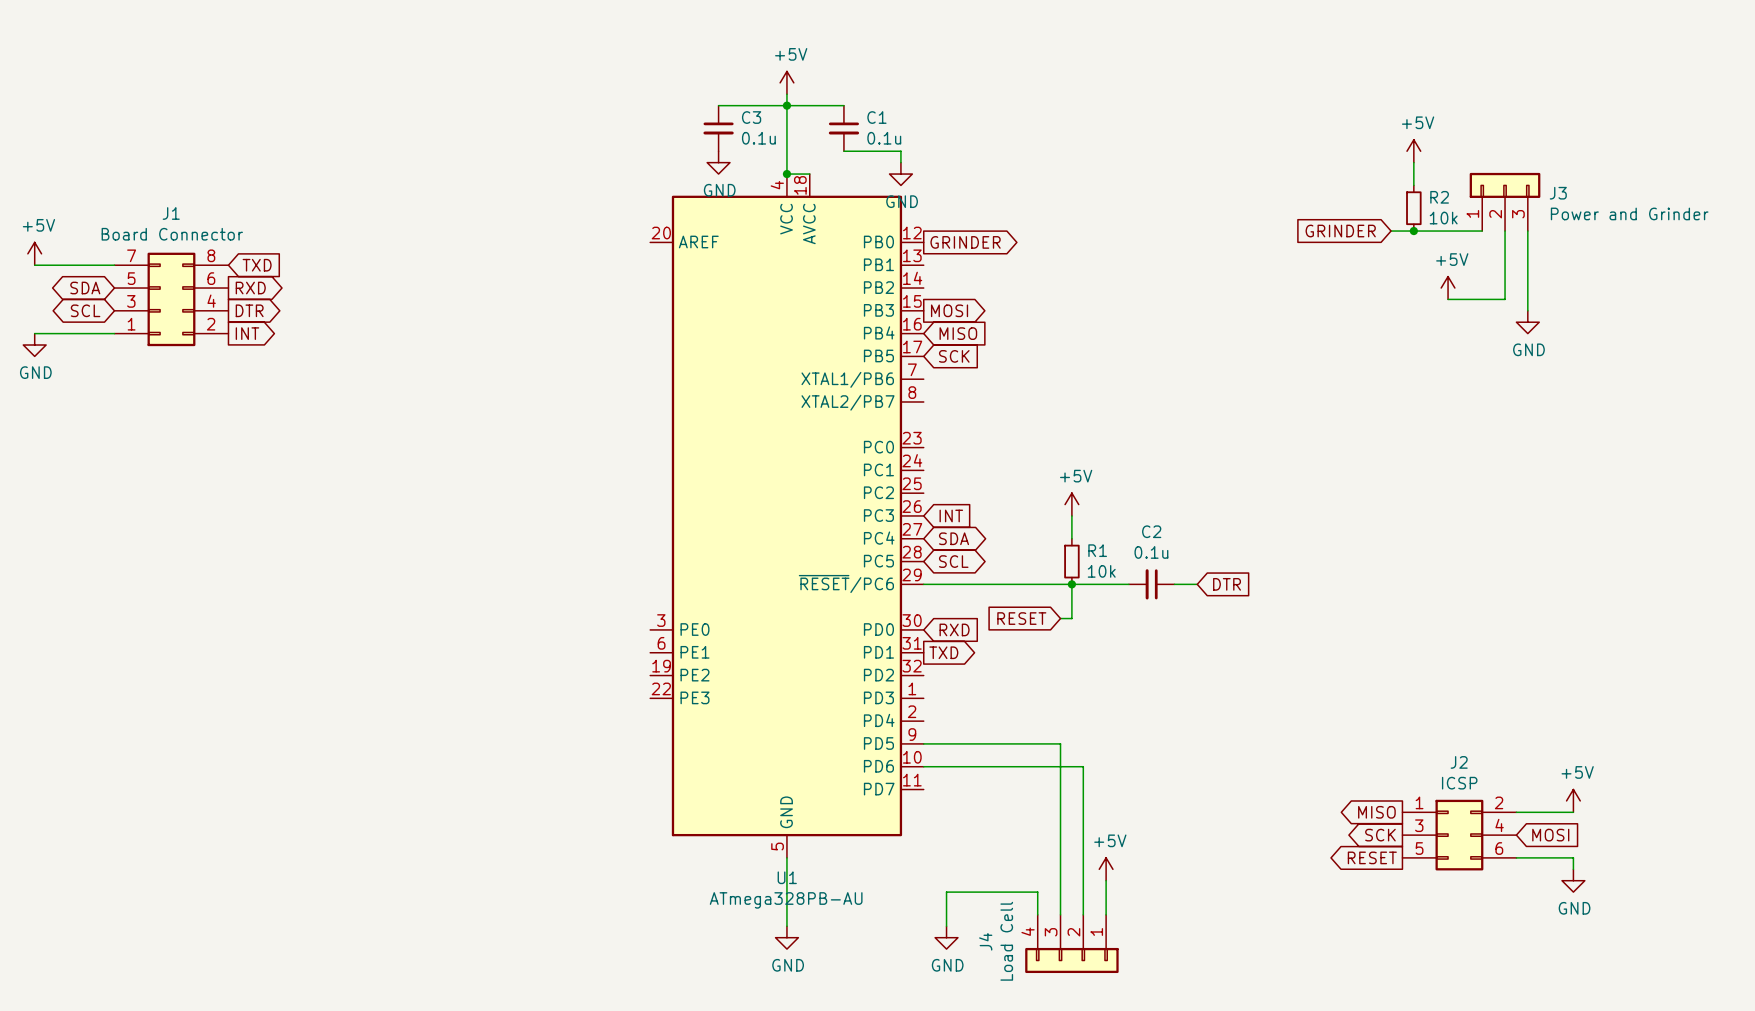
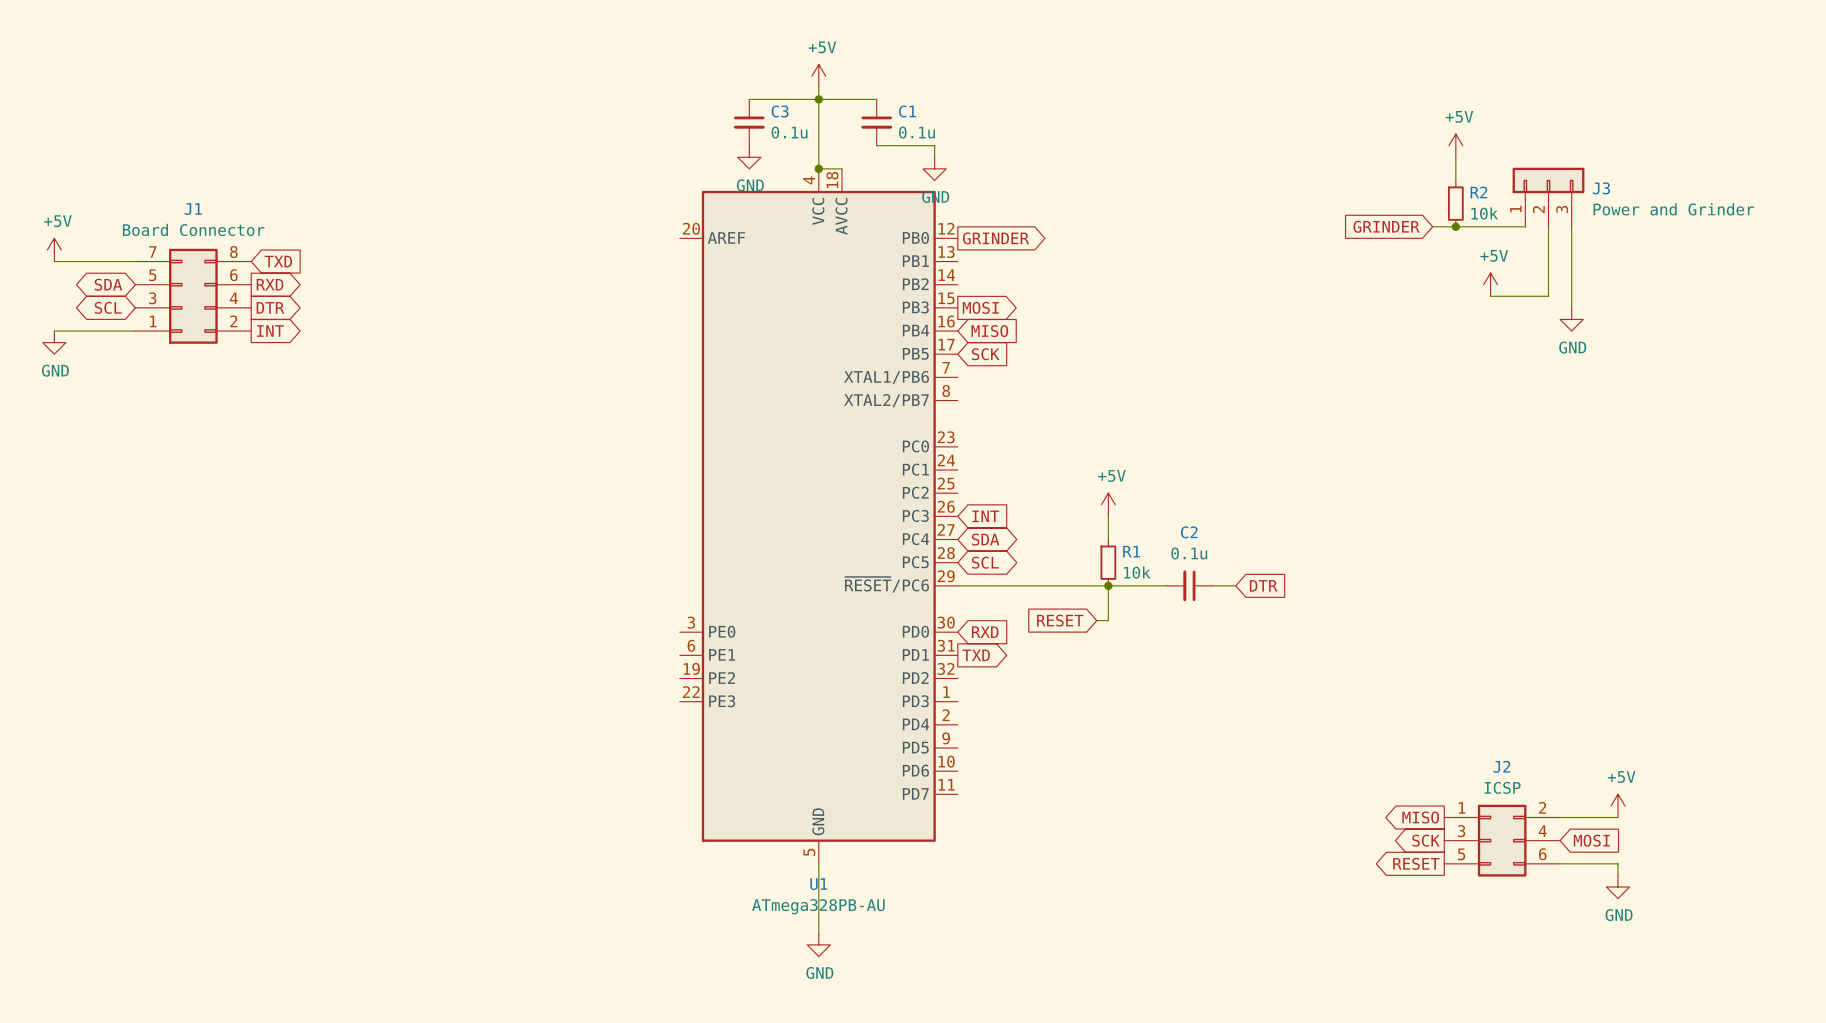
wire: (923, 743) (1060, 743) (1060, 914) -> none
wire: (923, 766) (1083, 766) (1083, 914) -> none
power symbol: +5V (1106, 869) -> none
wire: (1106, 880) (1106, 914) -> none
wire: (1037, 914) (1037, 892) (946, 892) (946, 926) -> none
power symbol: GND (946, 937) -> none
J4: Load Cell (1071, 943) -> none

